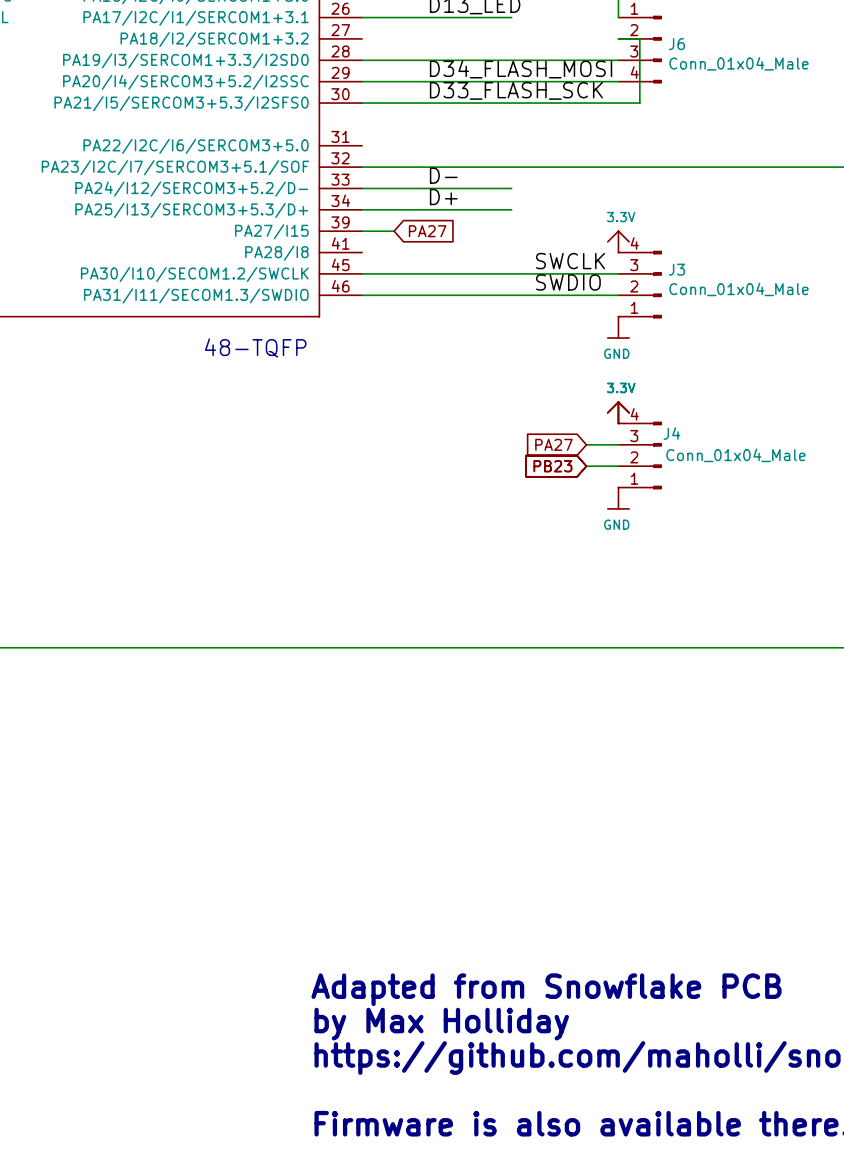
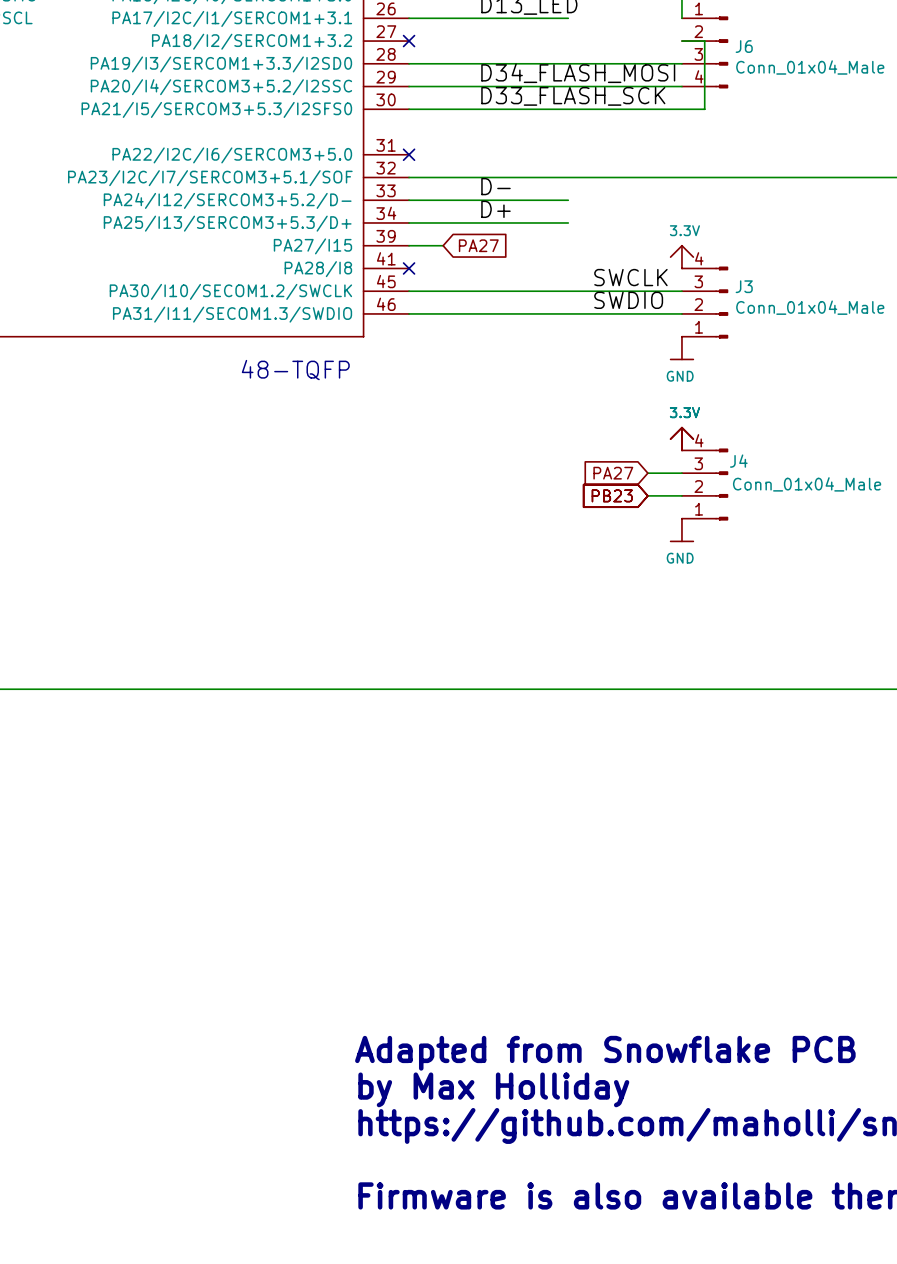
no-connect mark: none -> (409, 41)
no-connect mark: none -> (409, 154)
no-connect mark: none -> (409, 268)

